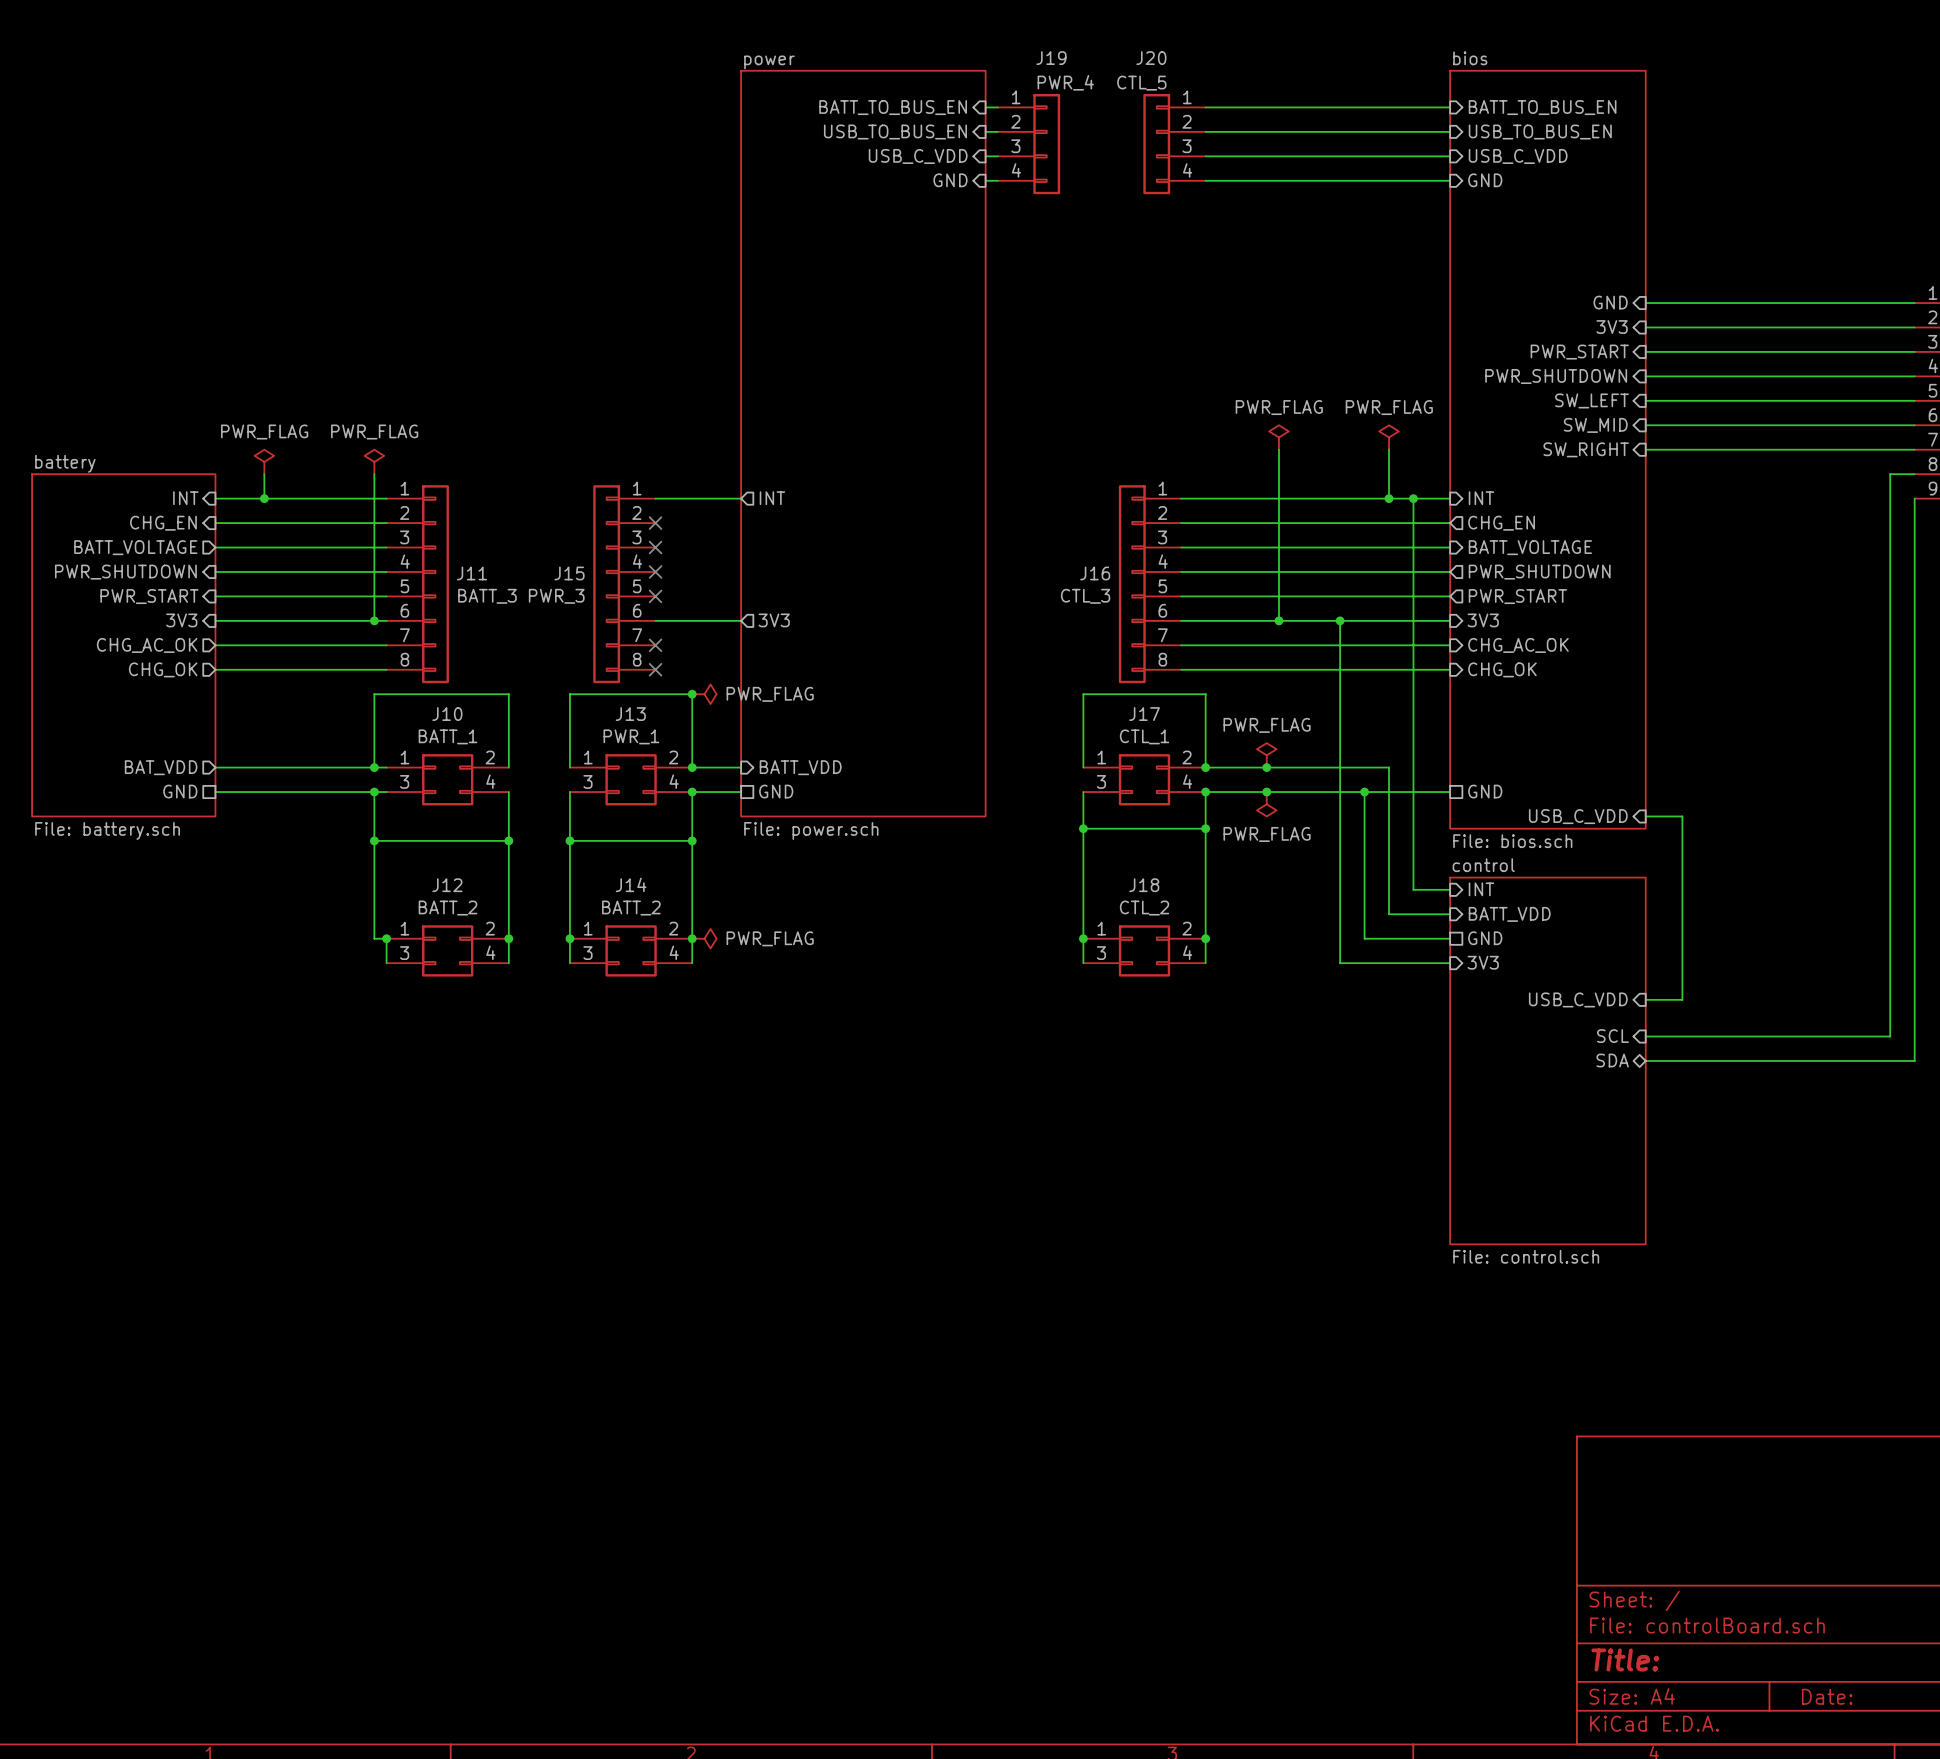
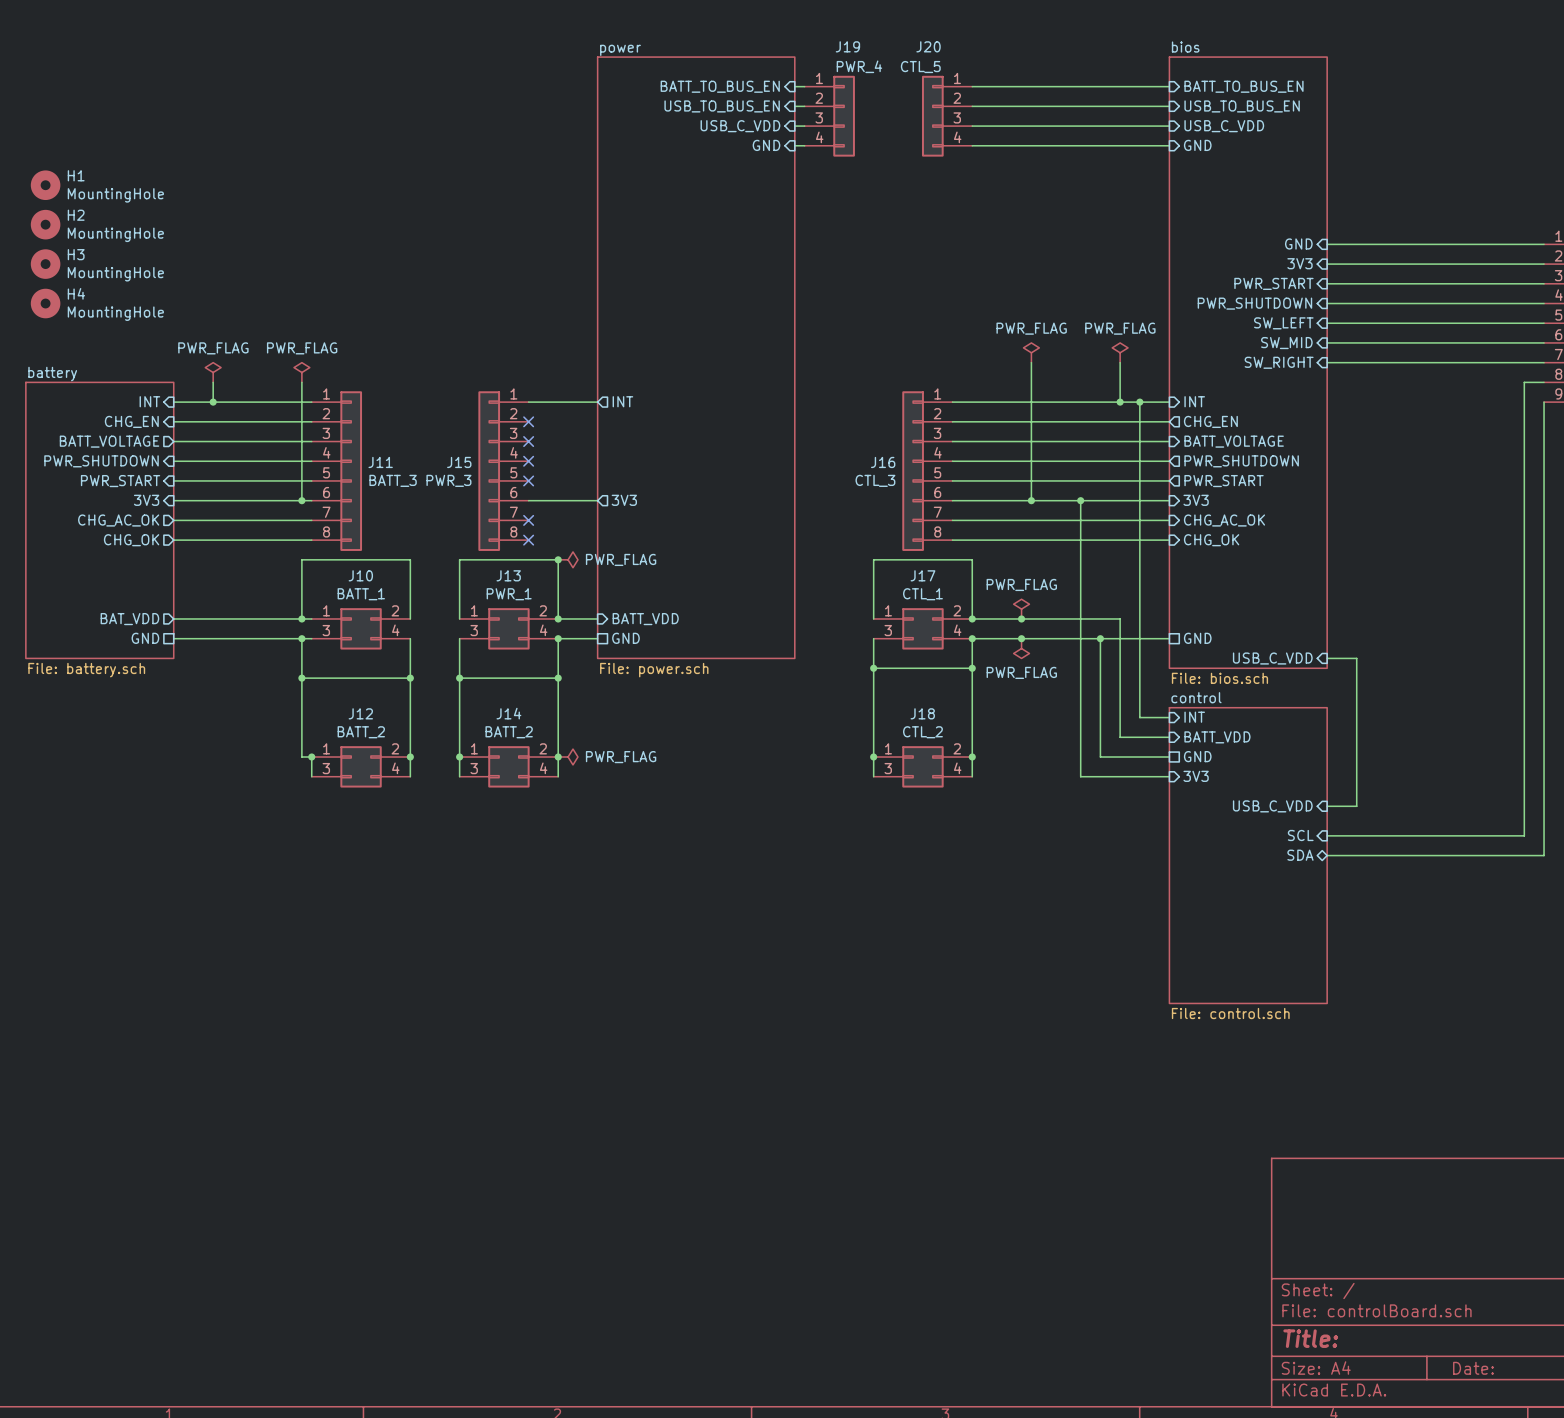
H1: none -> MountingHole (45, 185)
H2: none -> MountingHole (45, 224)
H3: none -> MountingHole (45, 264)
H4: none -> MountingHole (45, 303)

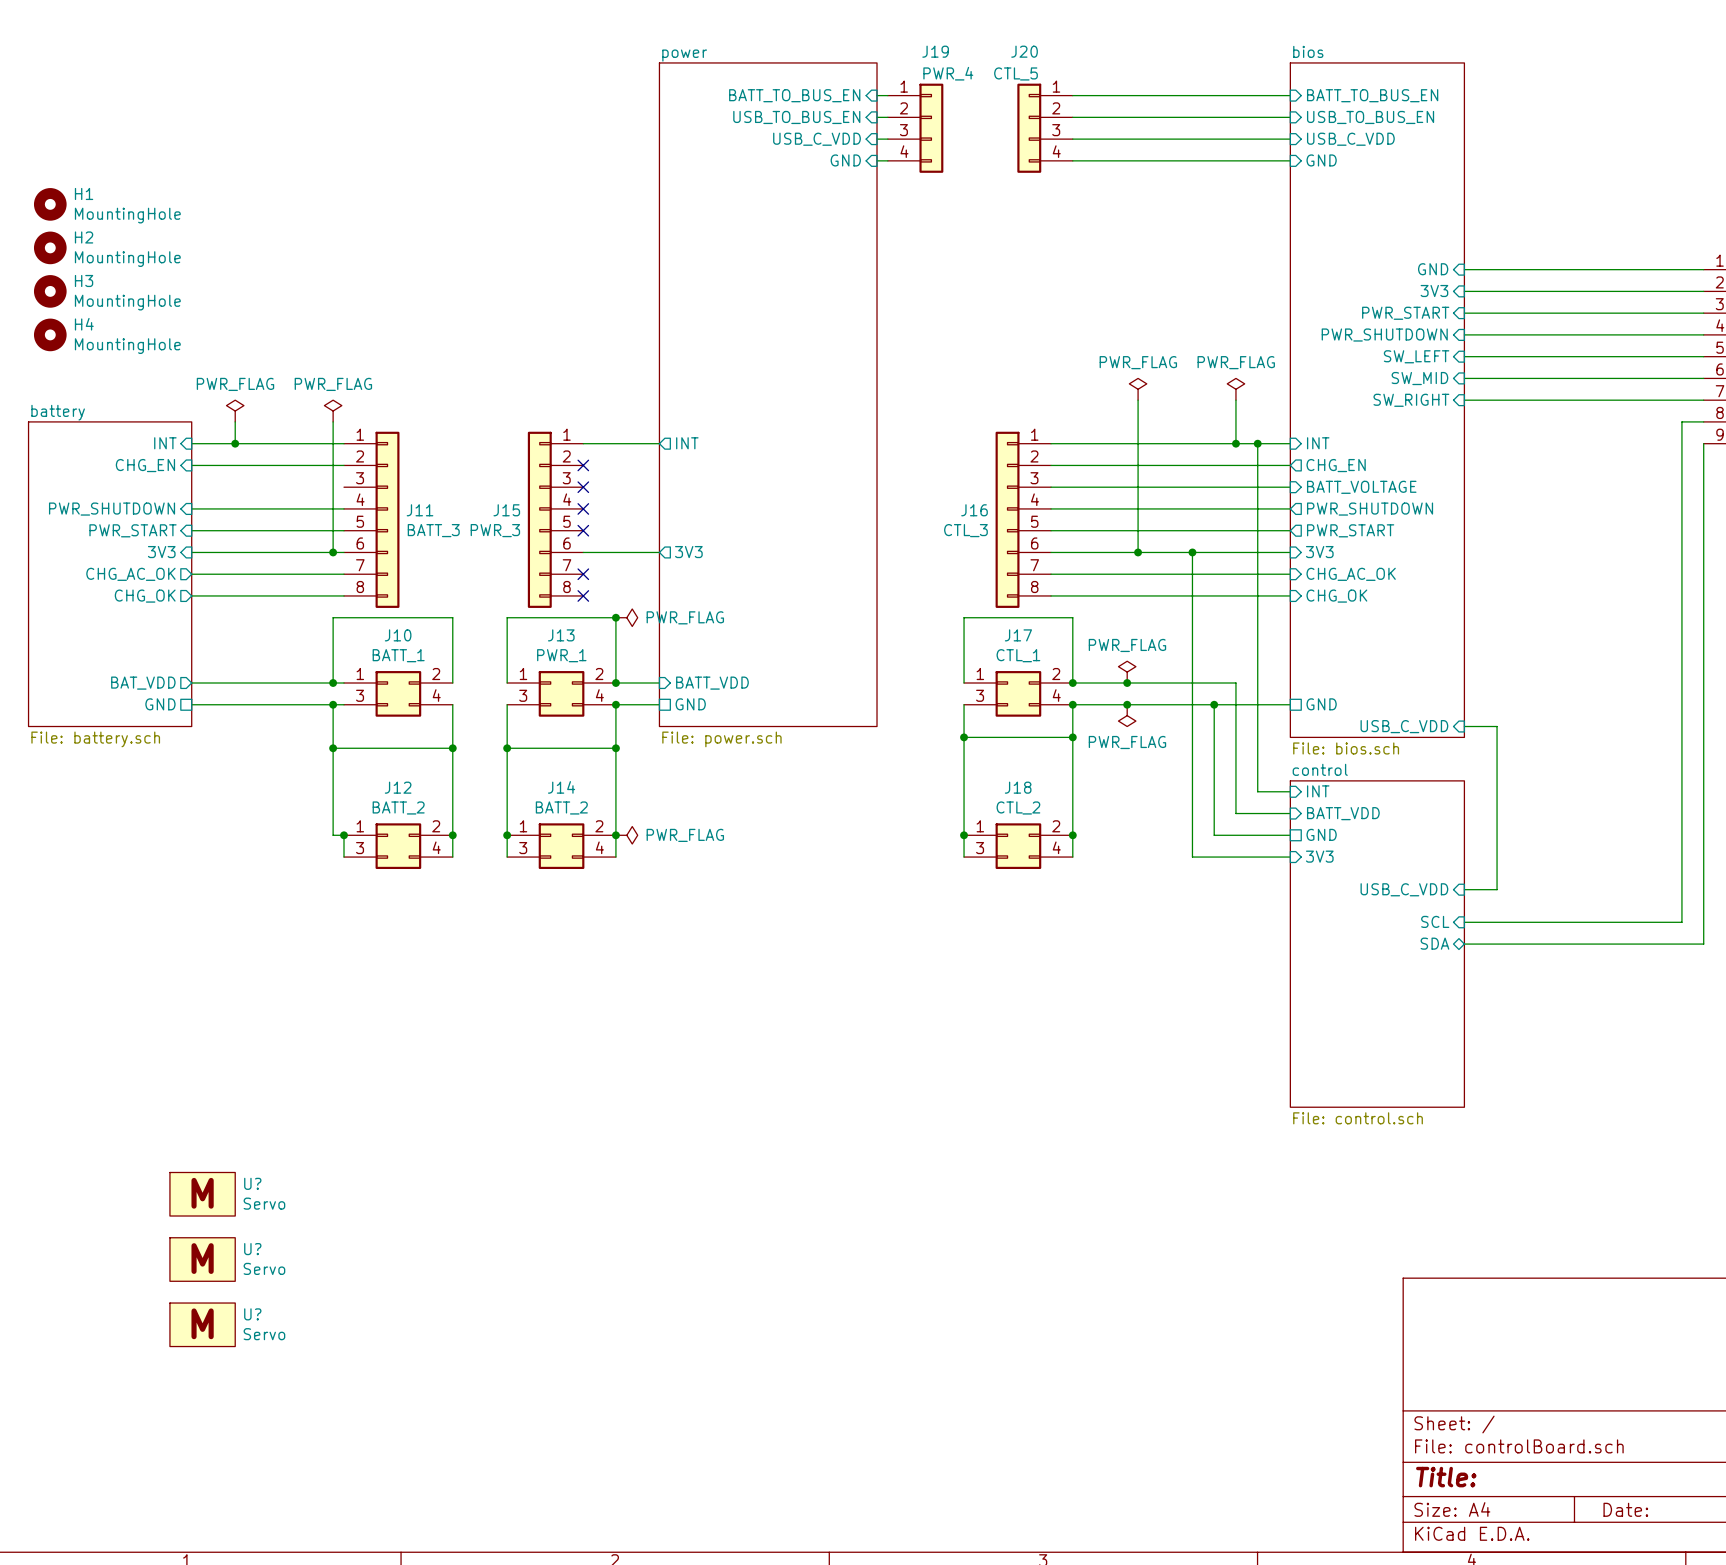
sheet pin: BATT_VOLTAGE (109, 441) -> none
wire: (173, 441) (311, 441) -> none
U?: none -> Servo (202, 1194)
U?: none -> Servo (202, 1259)
U?: none -> Servo (202, 1324)

